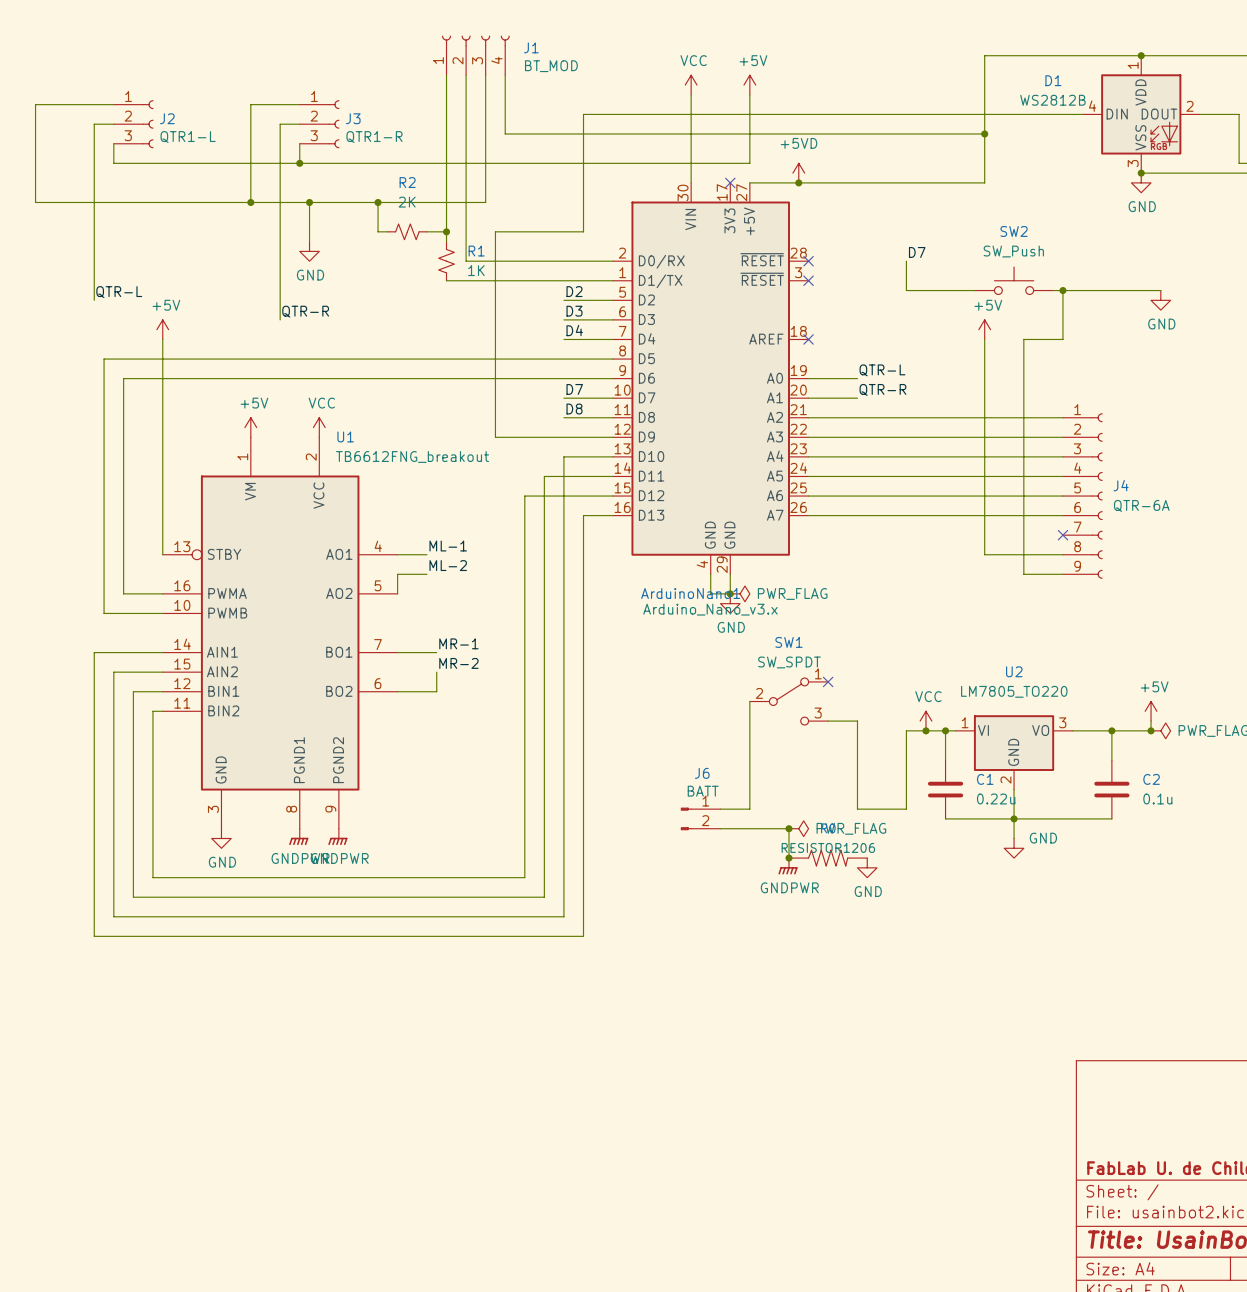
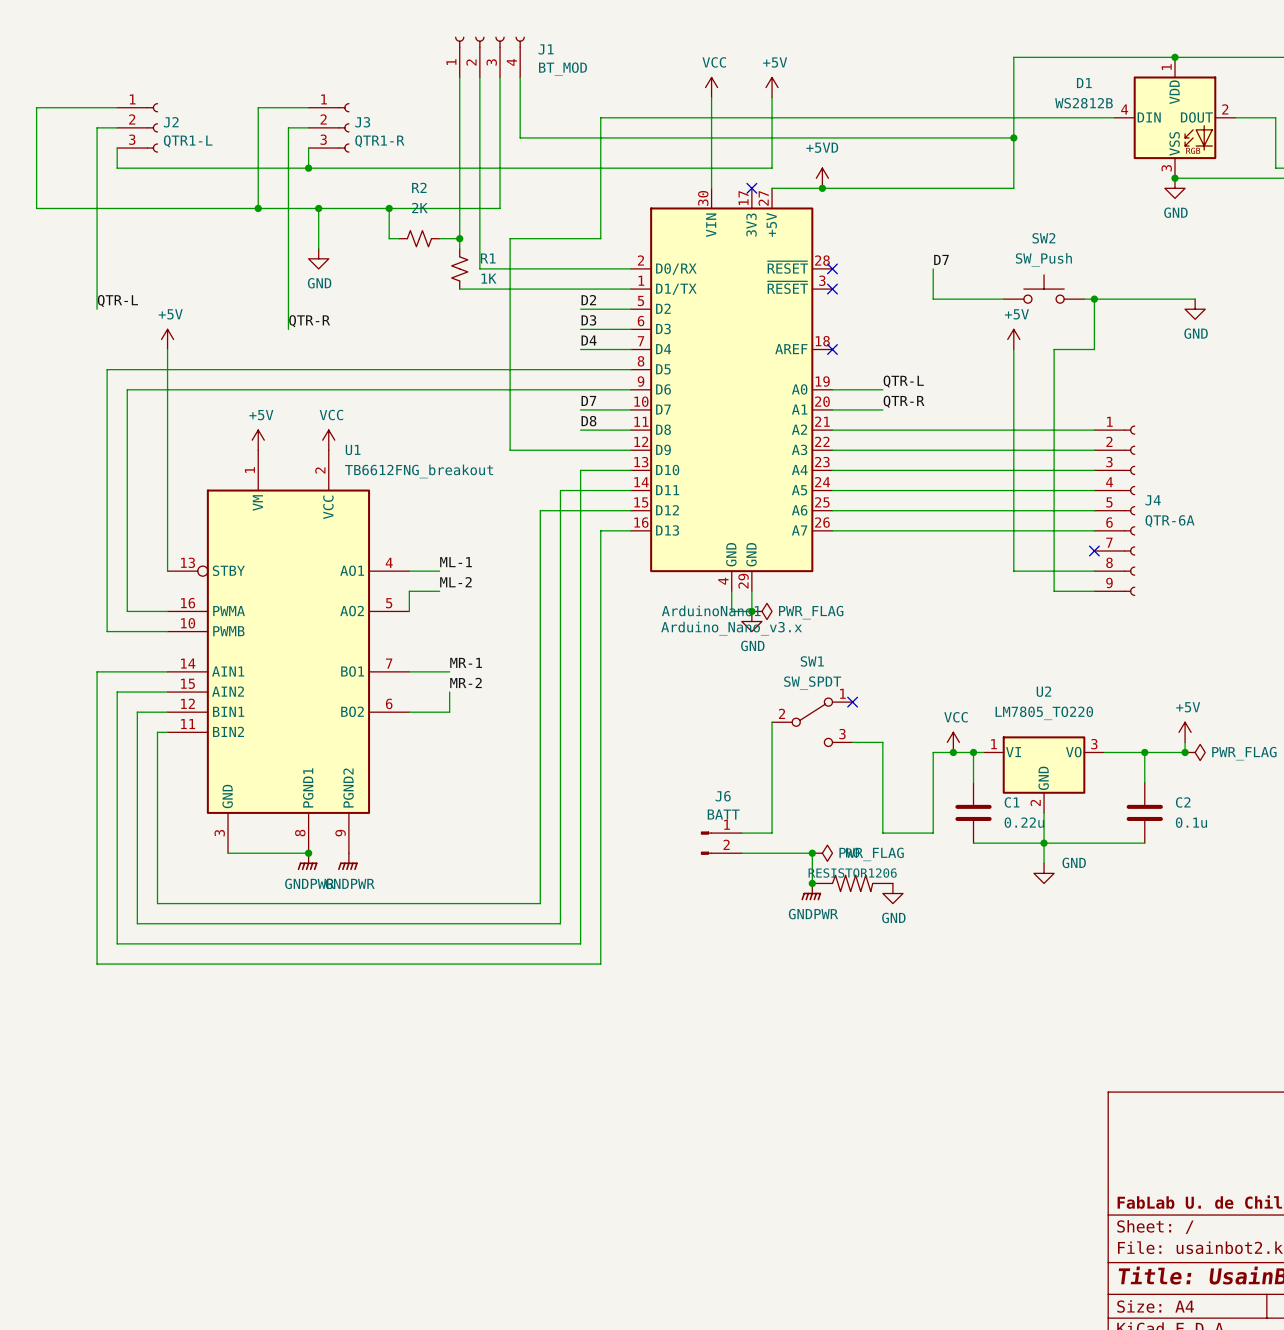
wire: none -> (228, 853) (308, 853)
junction: none -> (308, 853)
power symbol: GND (221, 838) -> none

